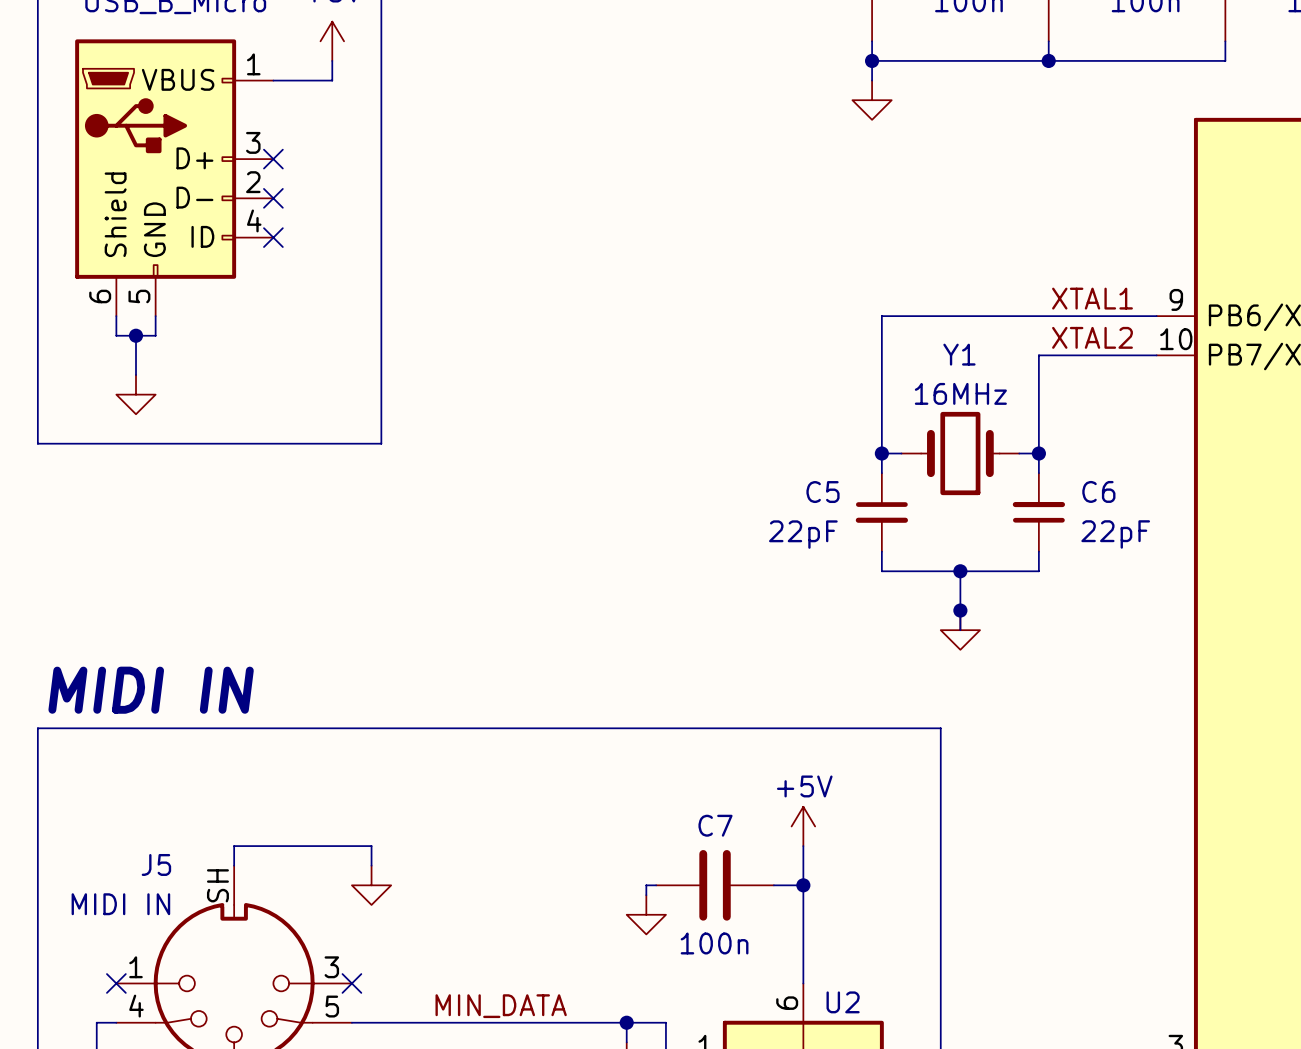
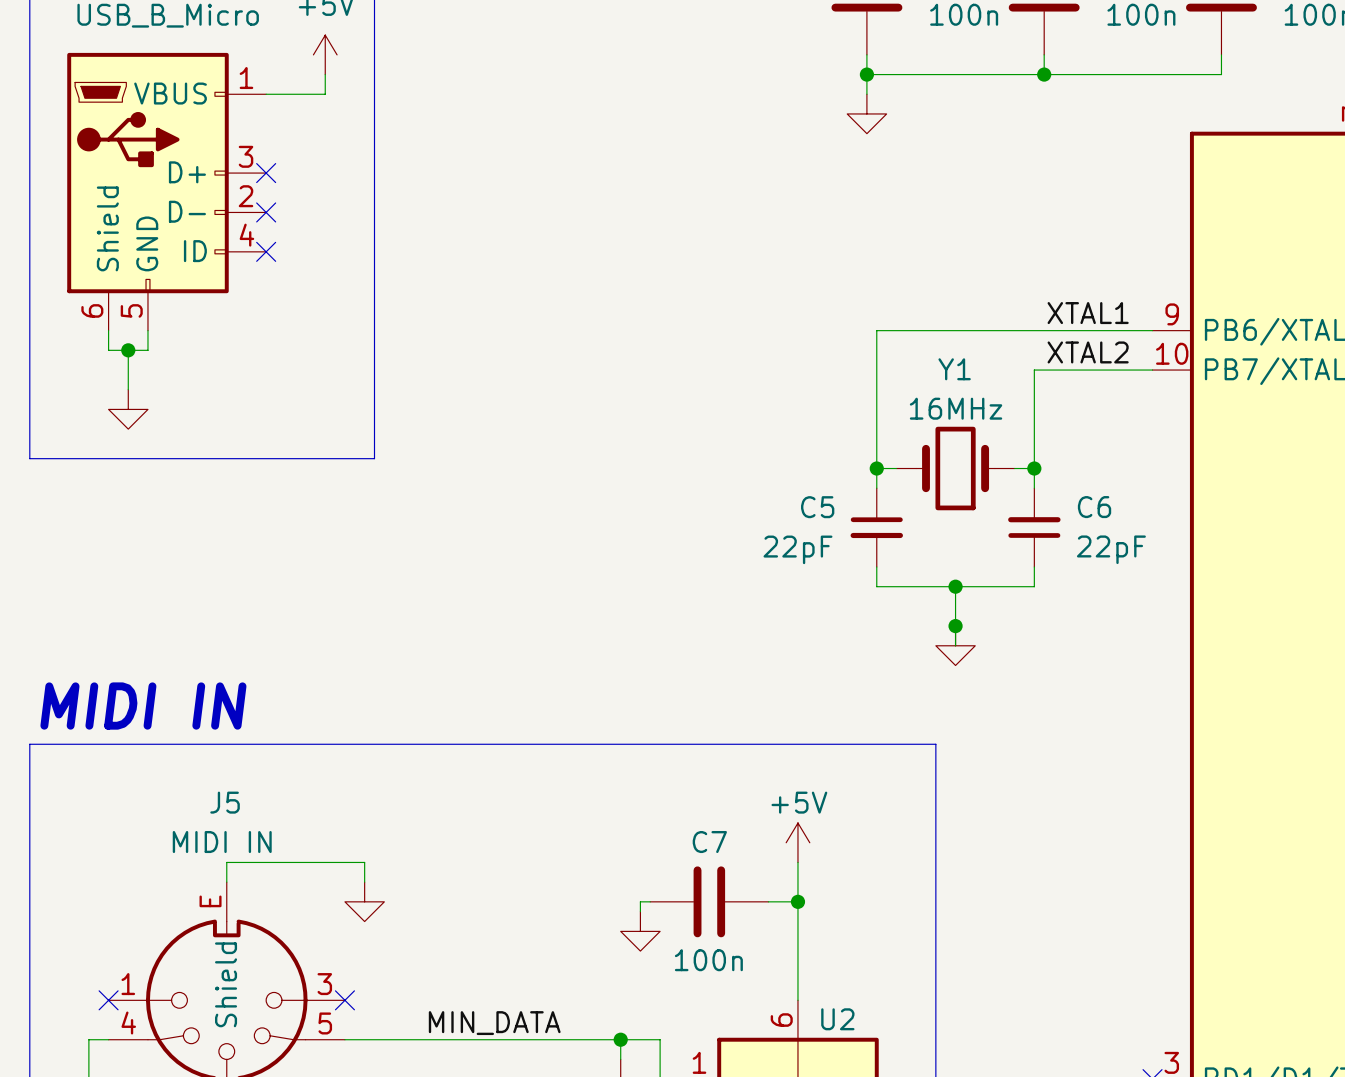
J5 name position: J5 (156, 864) -> J5 (225, 802)
J5 pin number: SH (217, 885) -> E (210, 901)
J5 value position: MIDI IN (120, 904) -> MIDI IN (222, 842)
J5 pin name: none -> Shield (226, 984)

